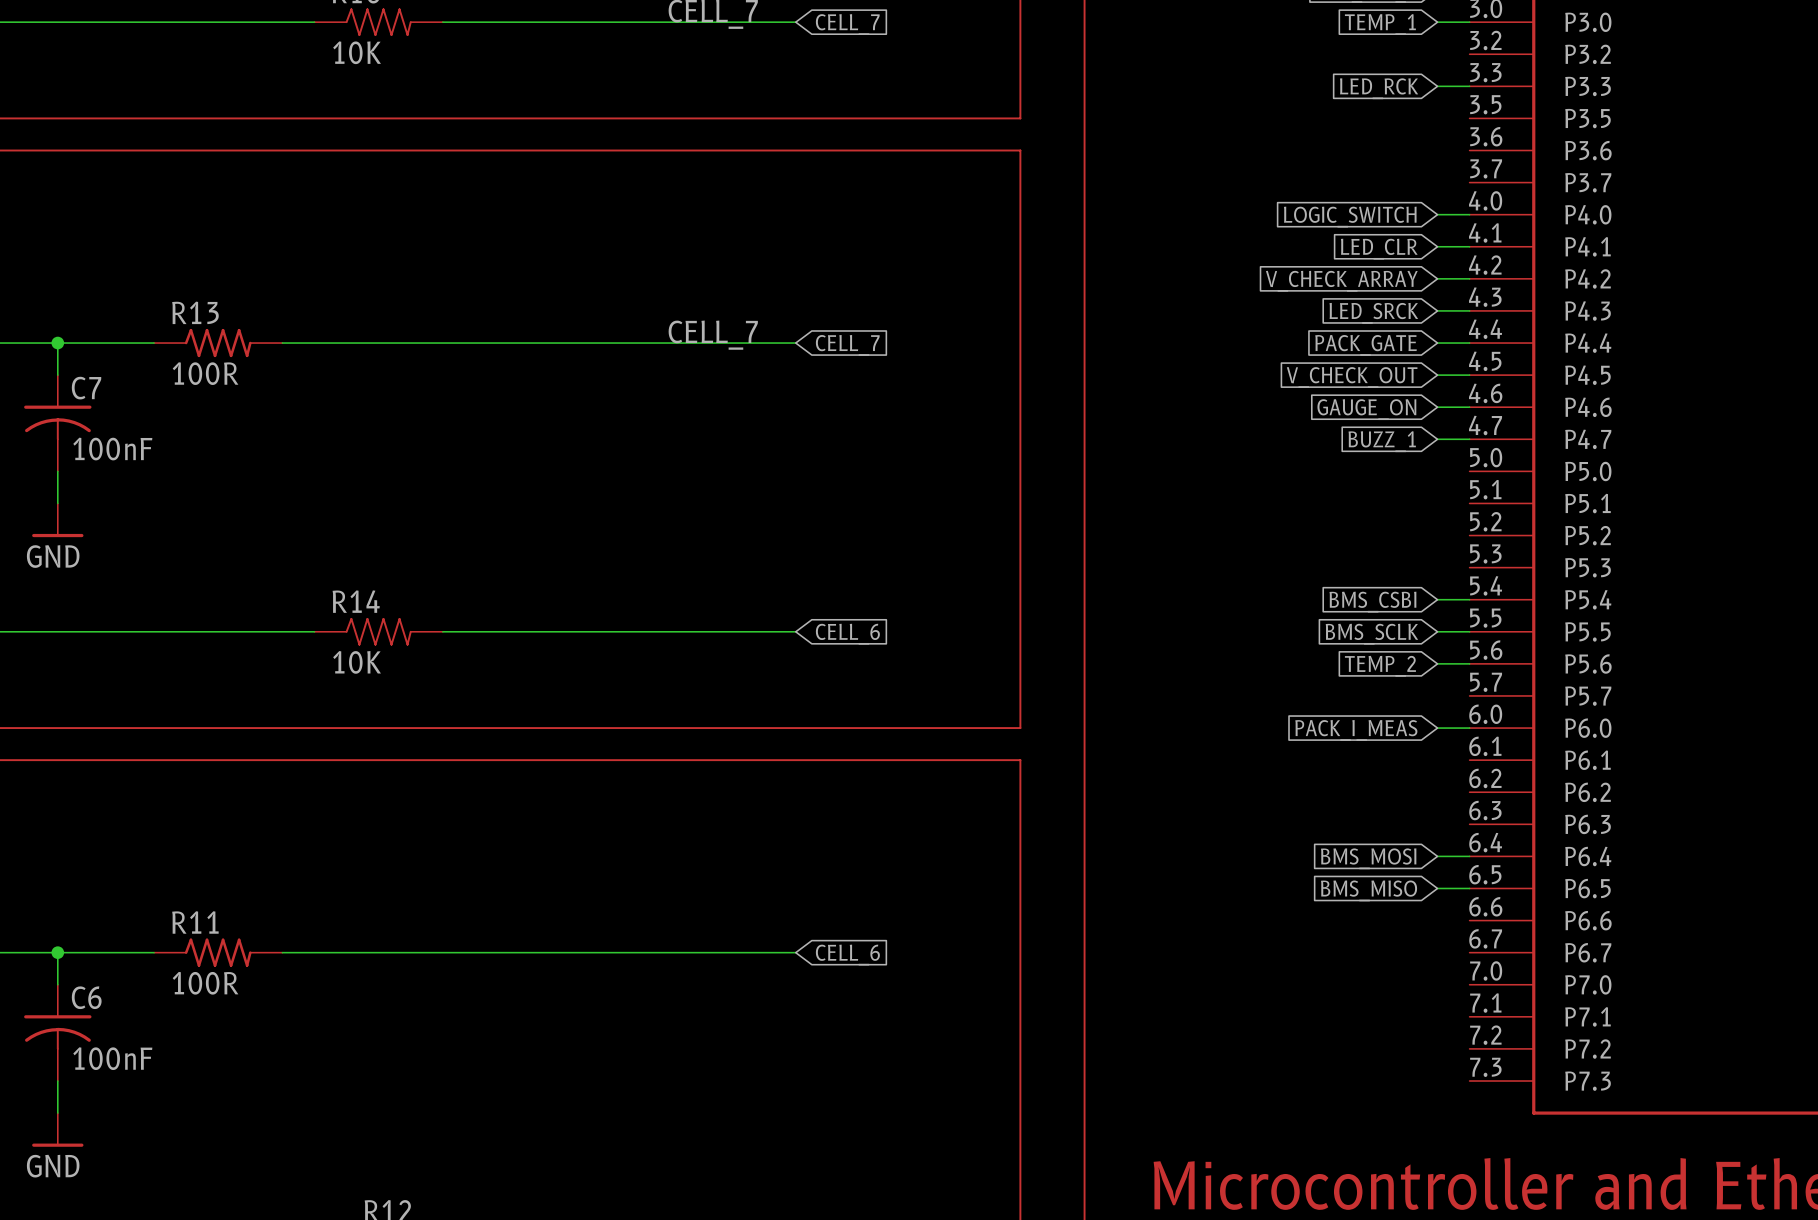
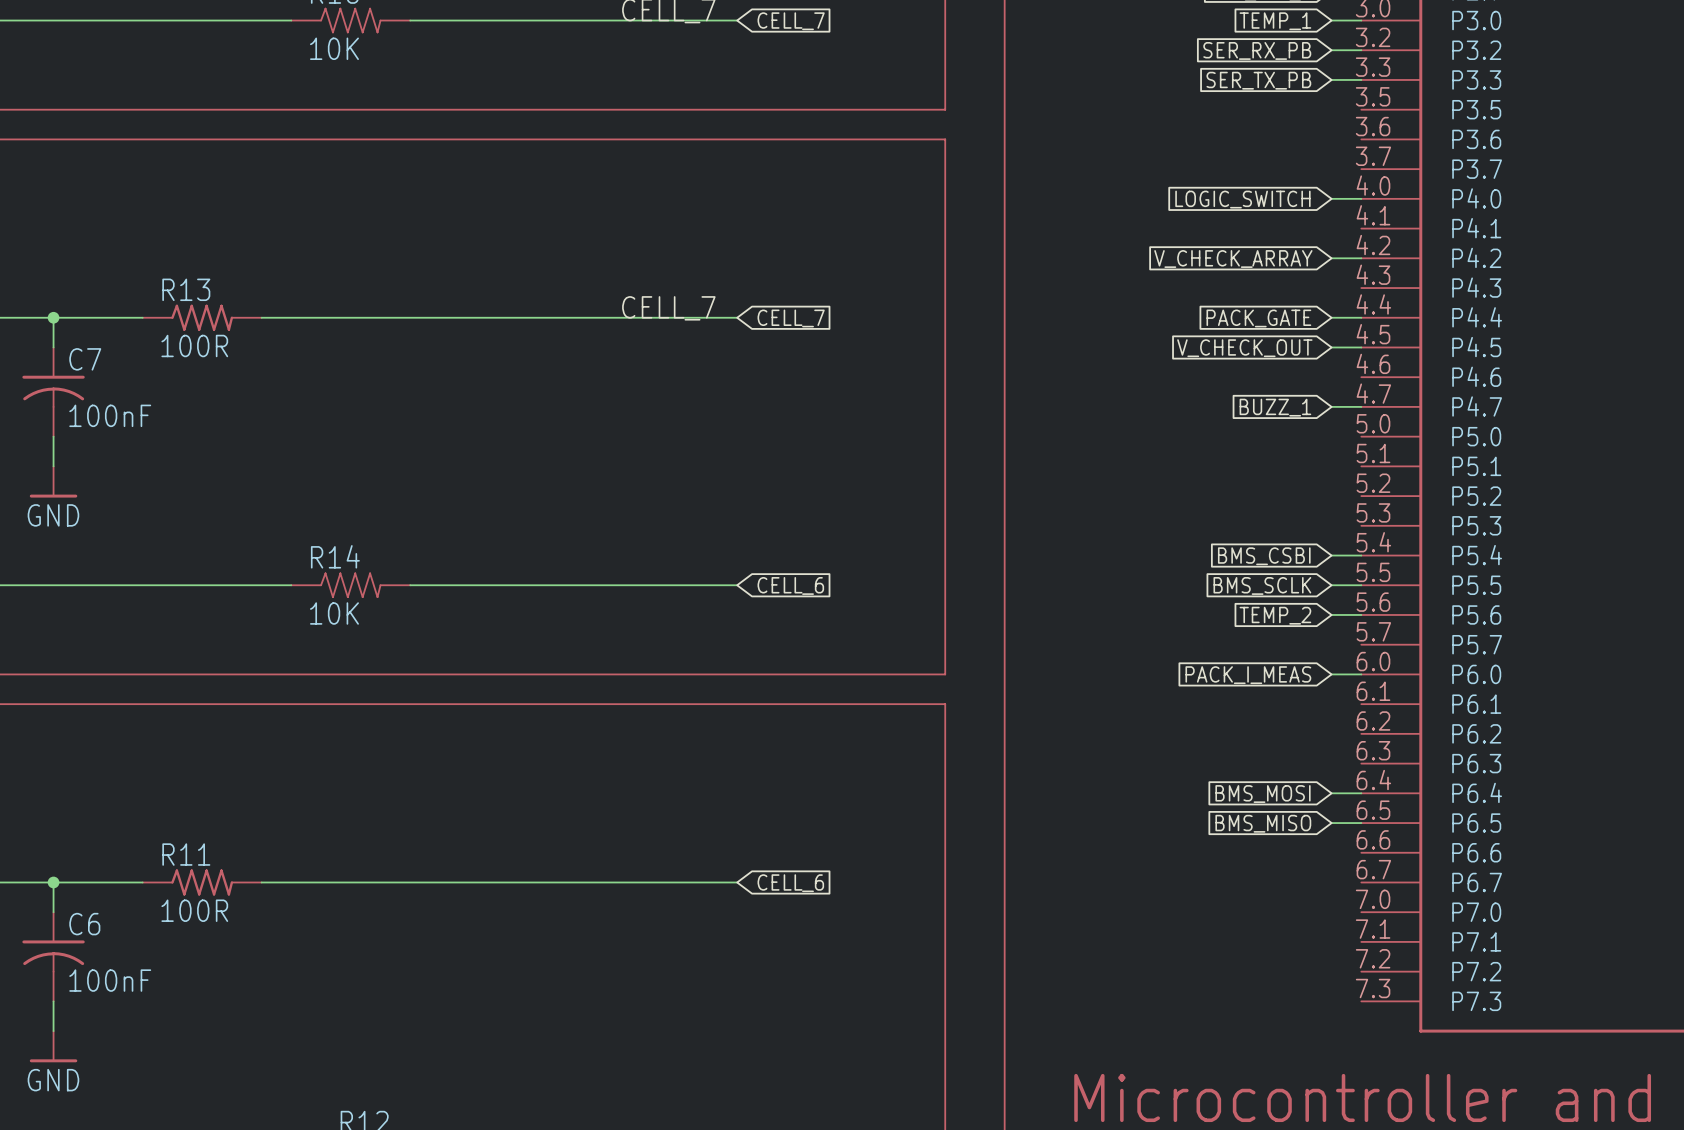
global label: none -> SER_RX_PB (1257, 50)
global label: LED_RCK (1379, 88) -> SER_TX_PB (1258, 80)
wire: (1437, 246) (1469, 246) -> (1331, 50) (1361, 50)
global label: LED_CLR (1379, 249) -> none
wire: (1437, 310) (1469, 310) -> none
global label: LED_SRCK (1373, 313) -> none
wire: (1437, 407) (1469, 407) -> none
global label: GAUGE_ON (1366, 409) -> none

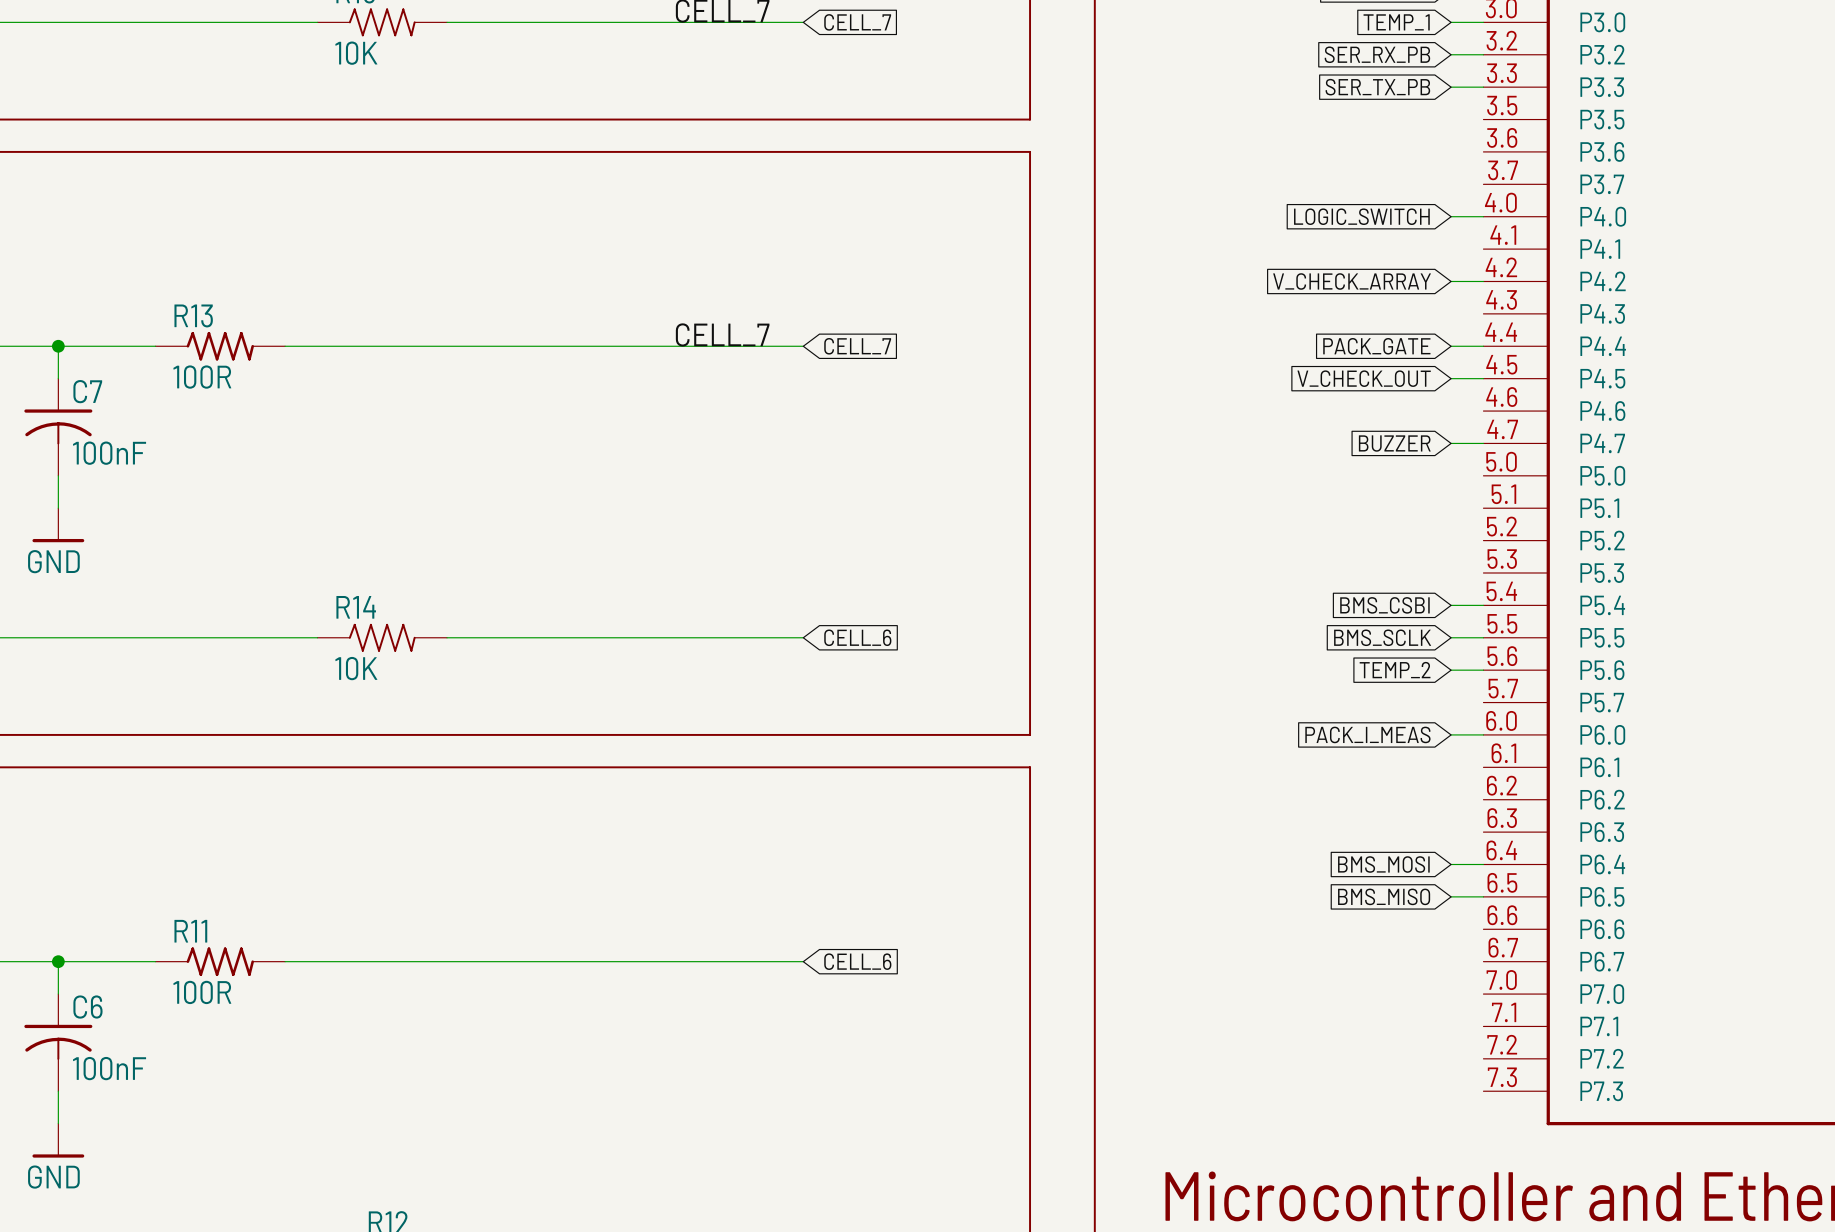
global label: BUZZ_1 (1275, 407) -> BUZZER (1394, 443)

